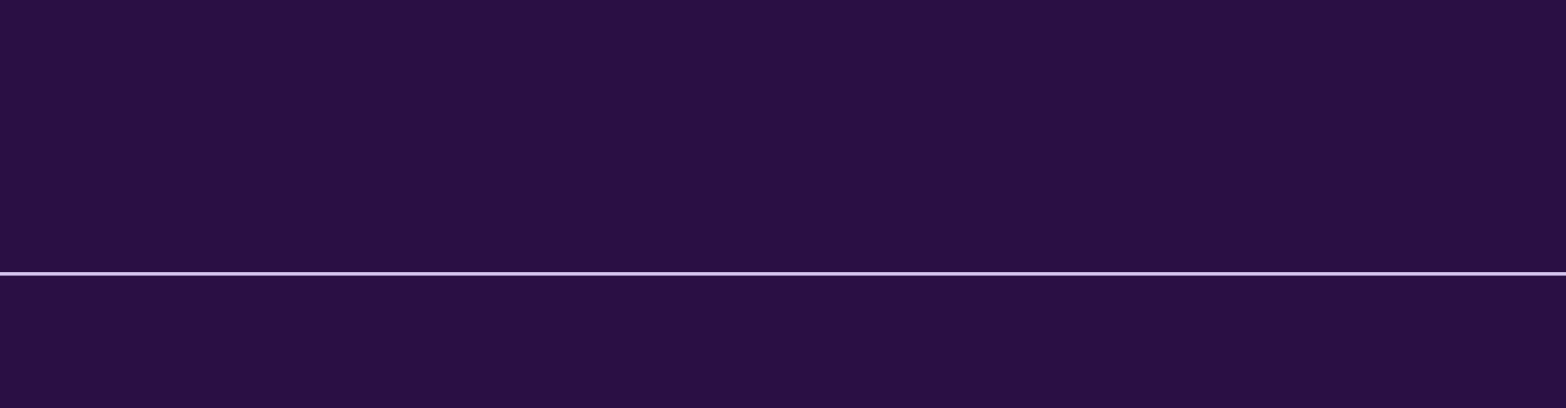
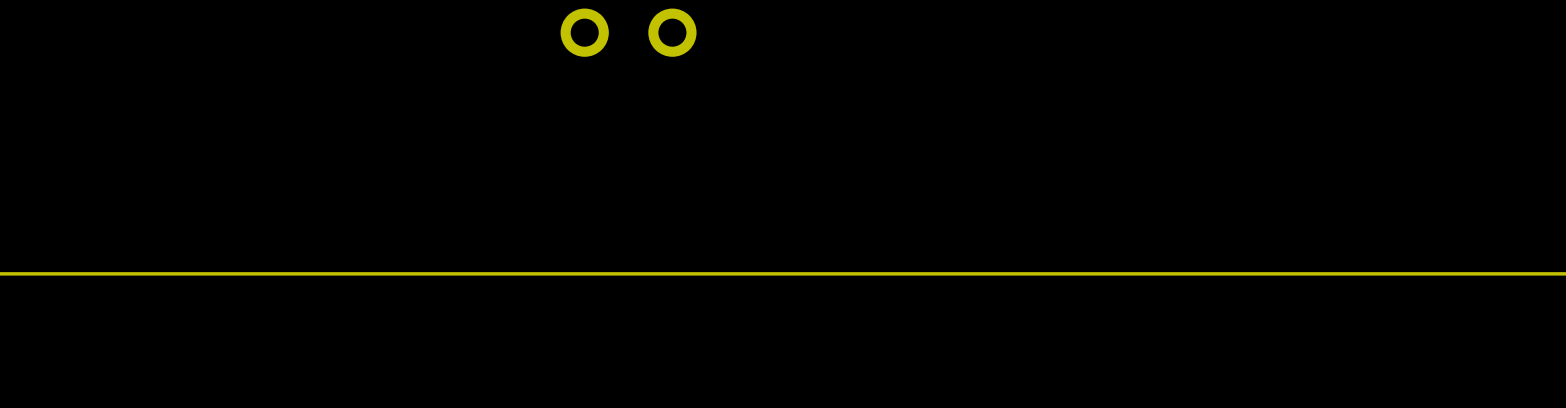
part: none -> (628, 32)

